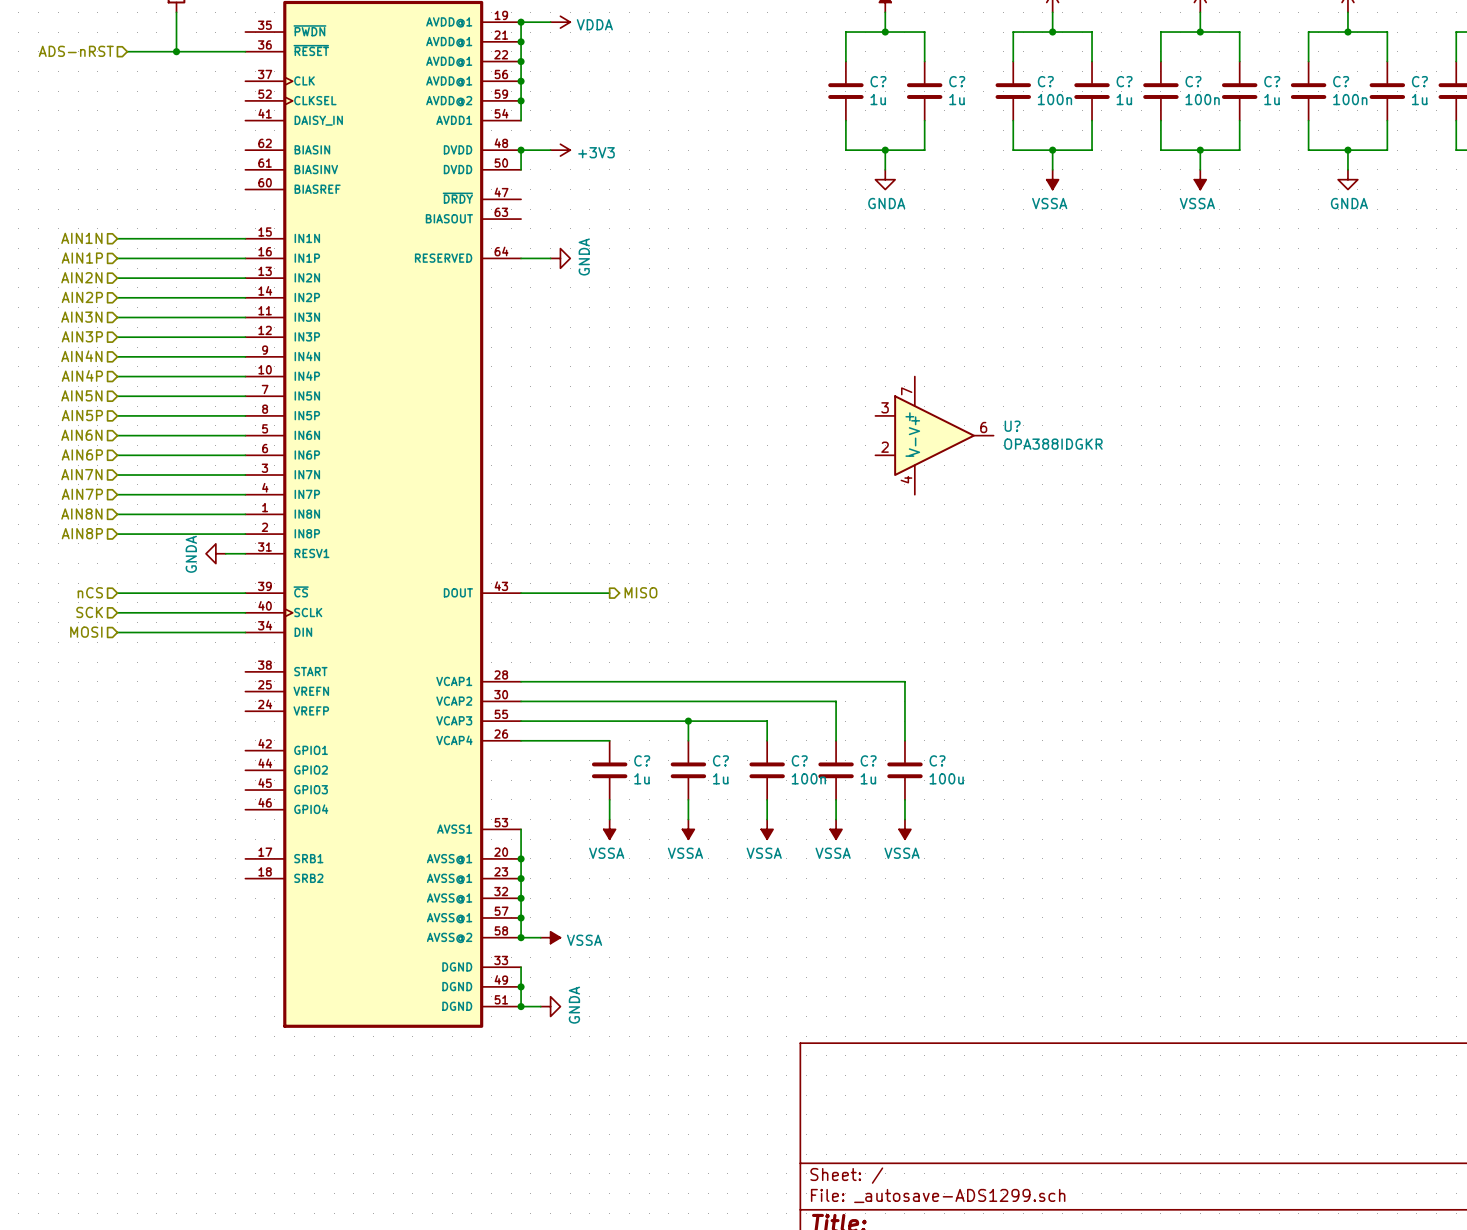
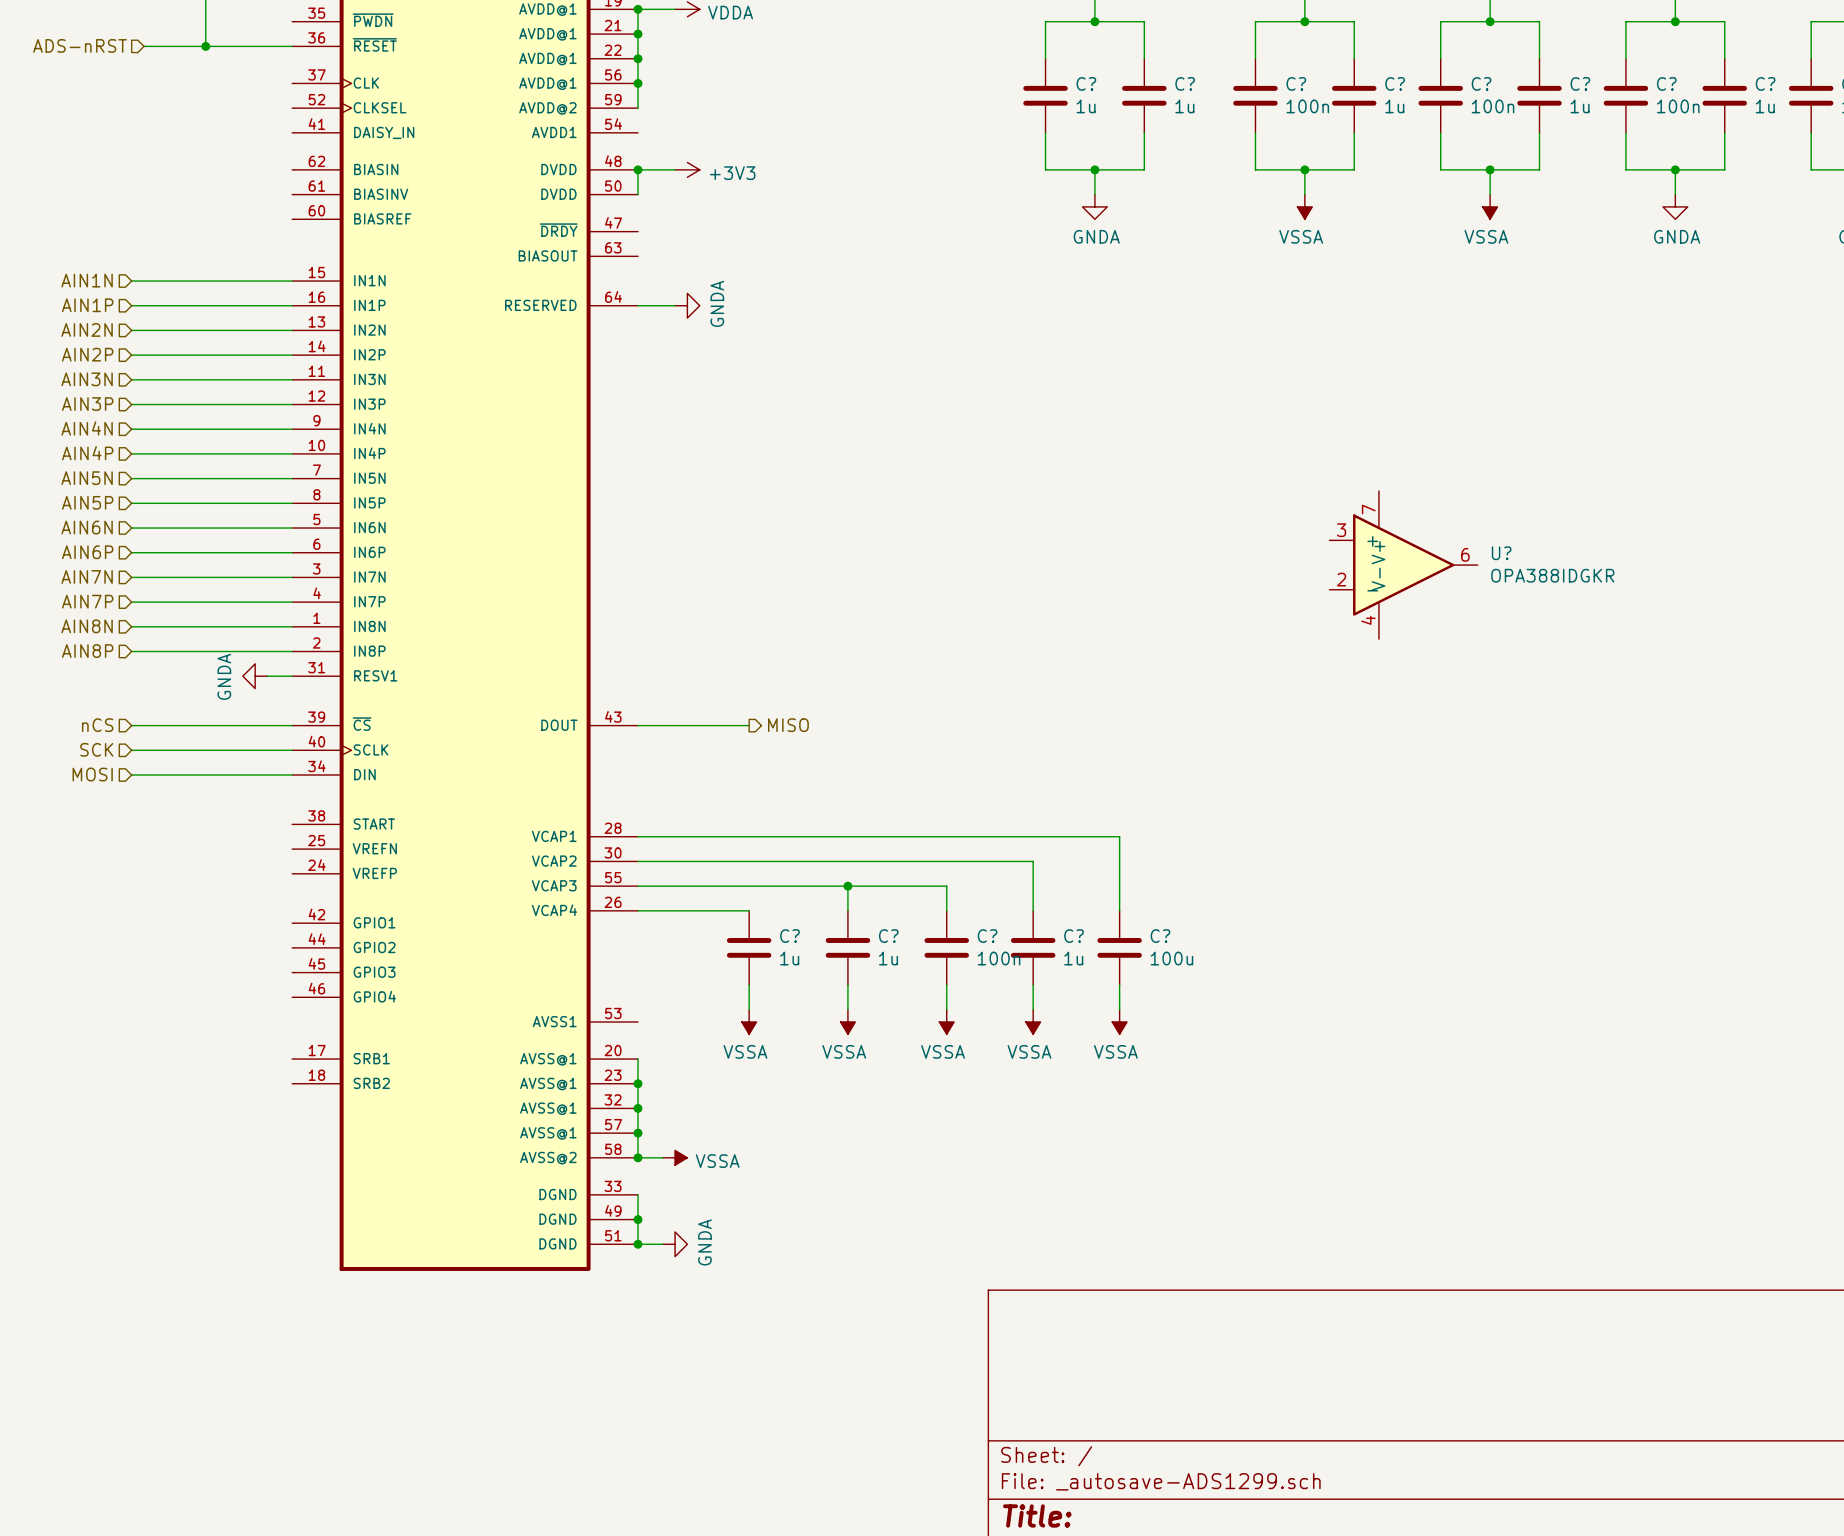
wire: (521, 100) (521, 120) -> none
junction: (521, 100) -> none
U?: OPA388IDGKR (934, 435) -> none
U?: none -> OPA388IDGKR (1403, 565)
wire: (521, 829) (521, 858) -> none
junction: (521, 858) -> none

